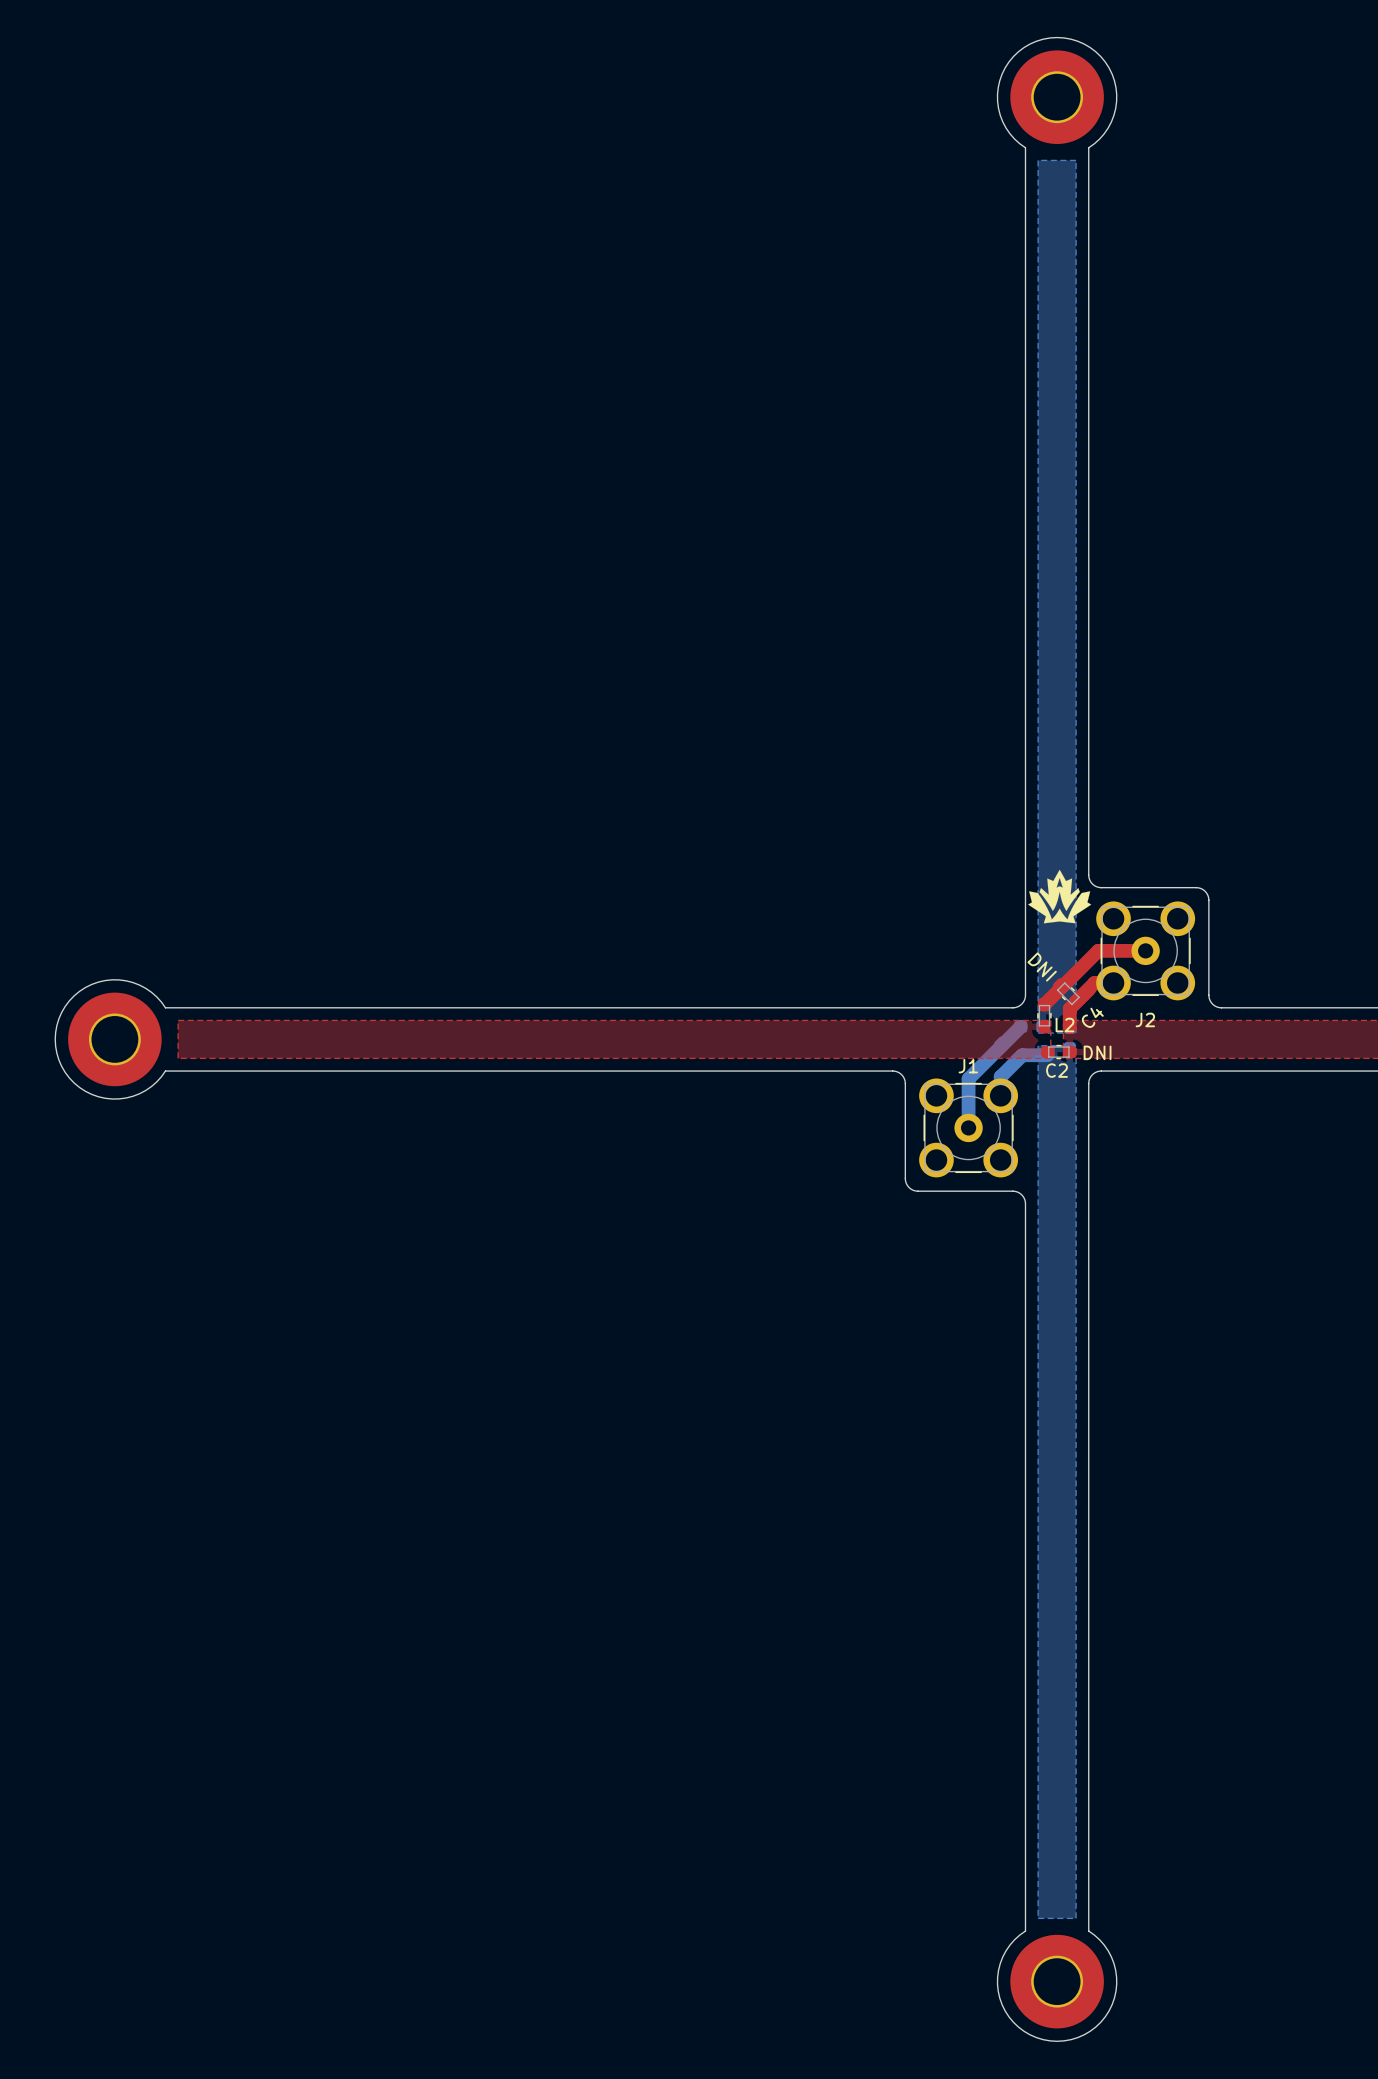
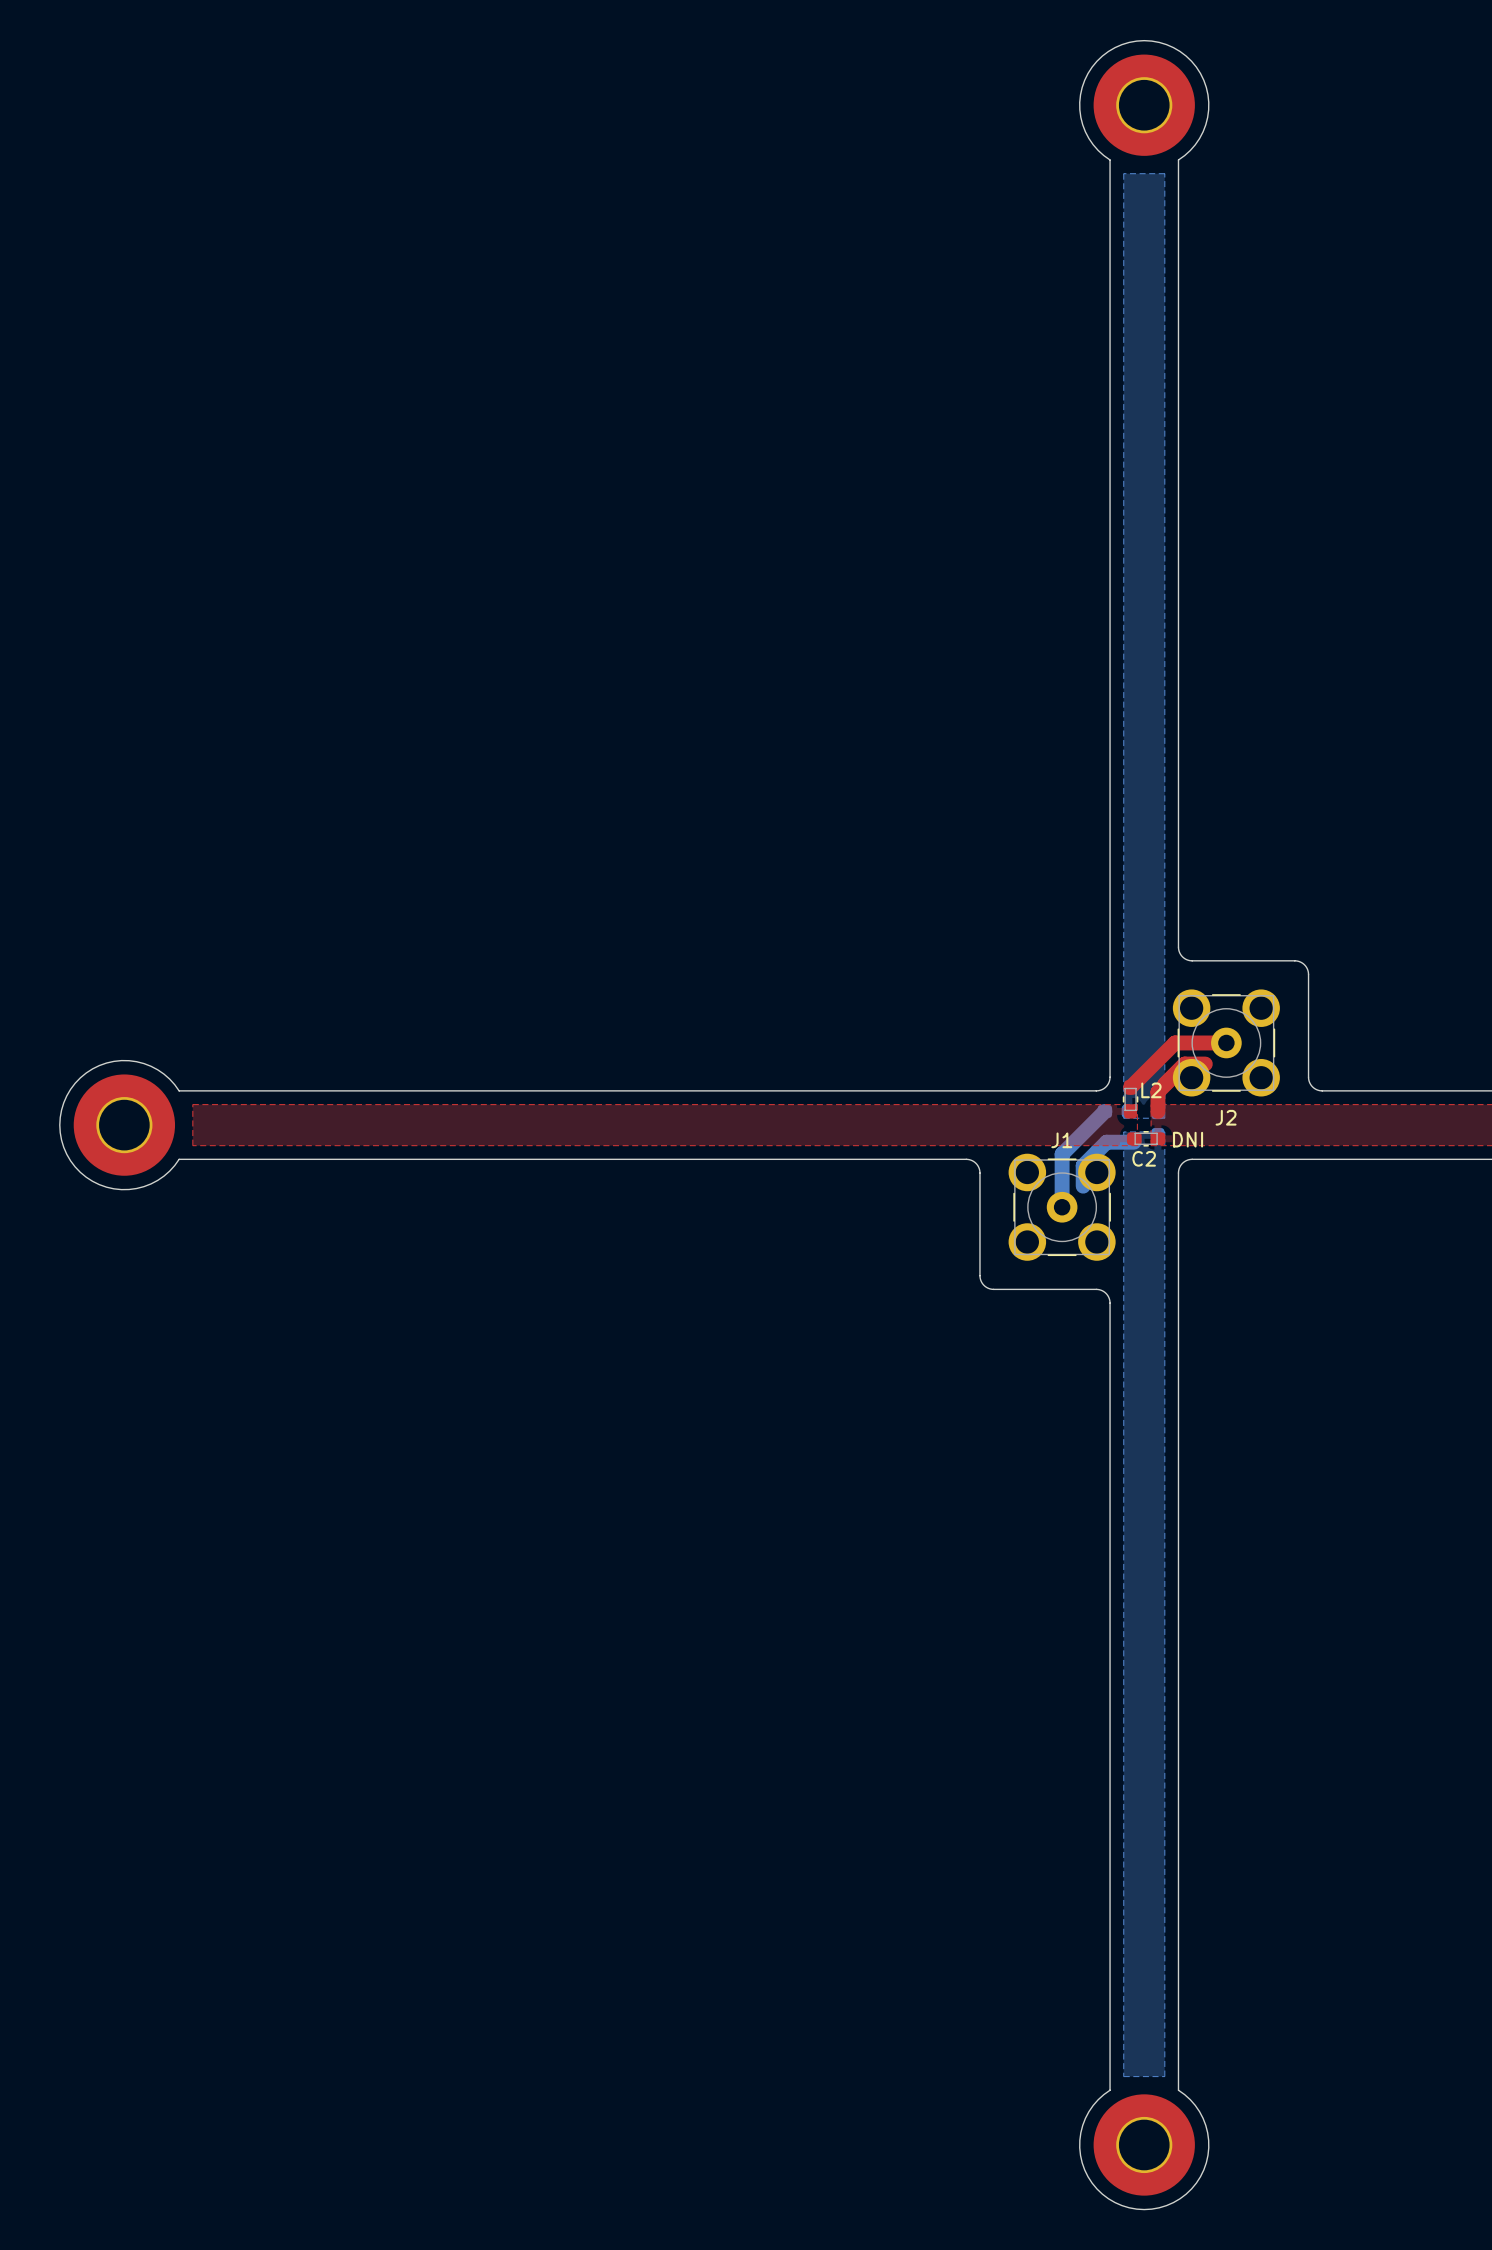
drawing: [1028, 869, 1092, 924] -> none
top track: (1145, 950) (1098, 950) (1085, 963) -> (1226, 1042) (1175, 1042)
J2 position: (1145, 950) -> (1226, 1042)
C4: DNI (1068, 993) -> none
L2 name position: L2 (1065, 1025) -> L2 (1151, 1090)
bottom track: (981, 1066) (968, 1078) (968, 1127) -> (1062, 1154) (1062, 1207)
J1 position: (968, 1127) -> (1062, 1207)

